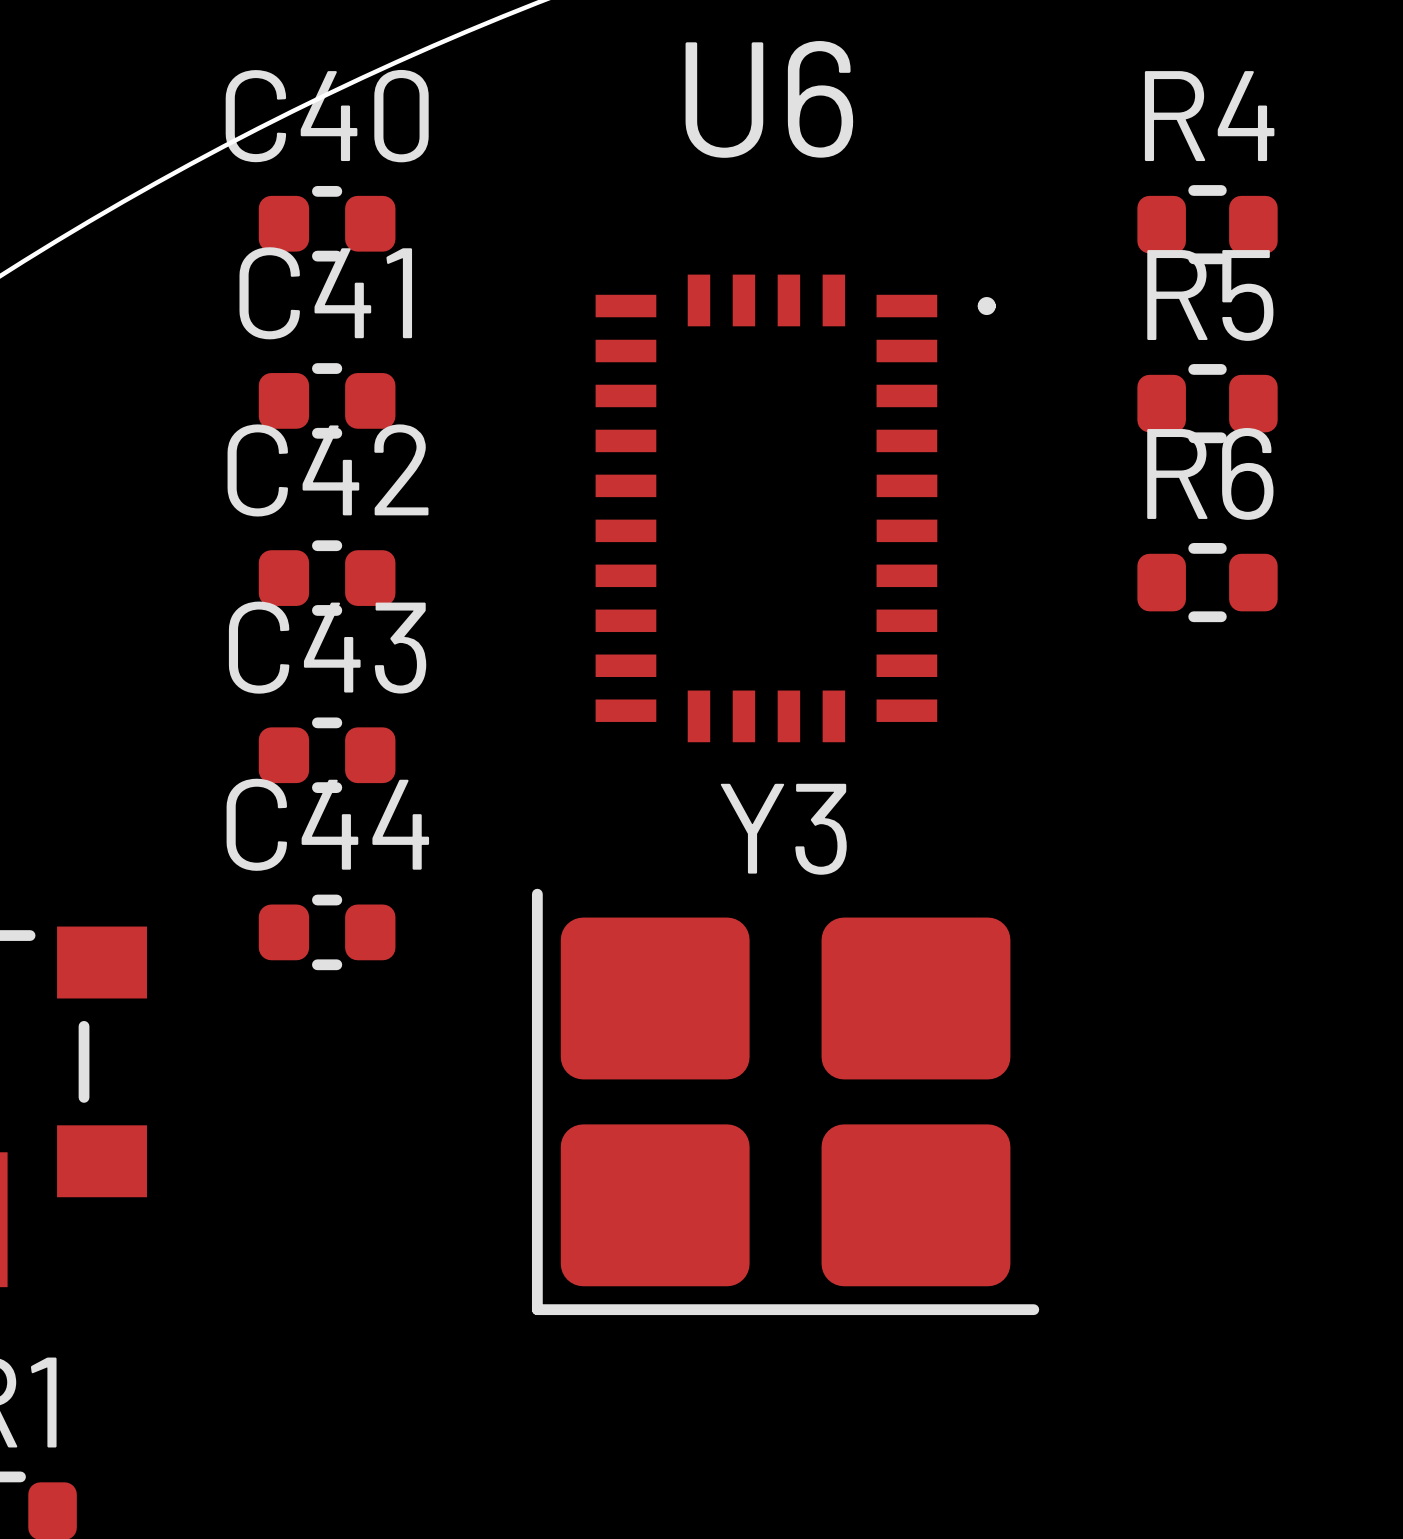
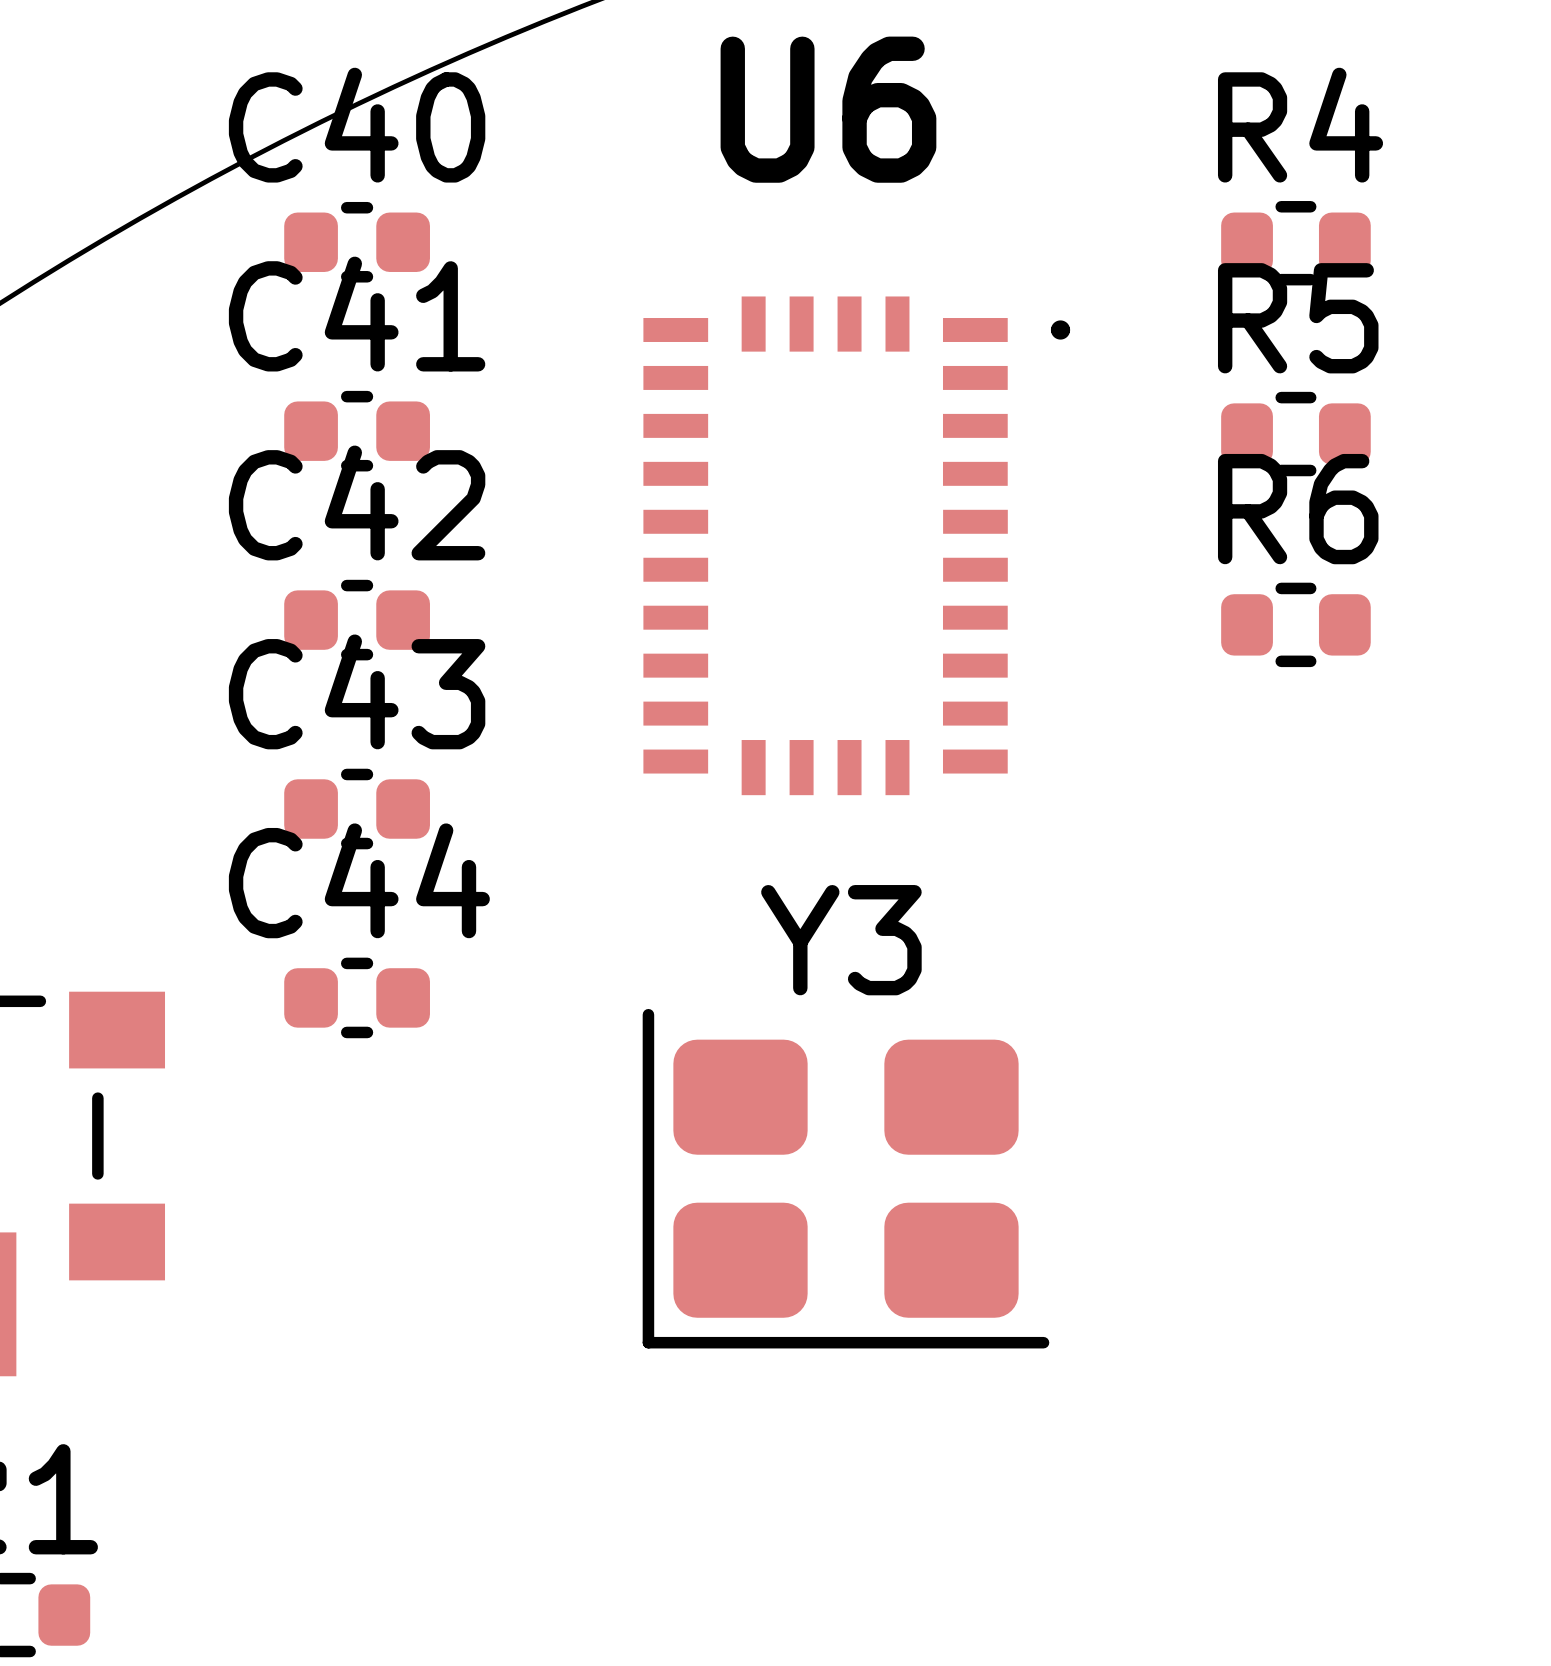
Y3 name position: Y3 (783, 829) -> Y3 (841, 940)
Y3 footprint: [531, 888, 1040, 1316] -> [642, 1008, 1050, 1349]

